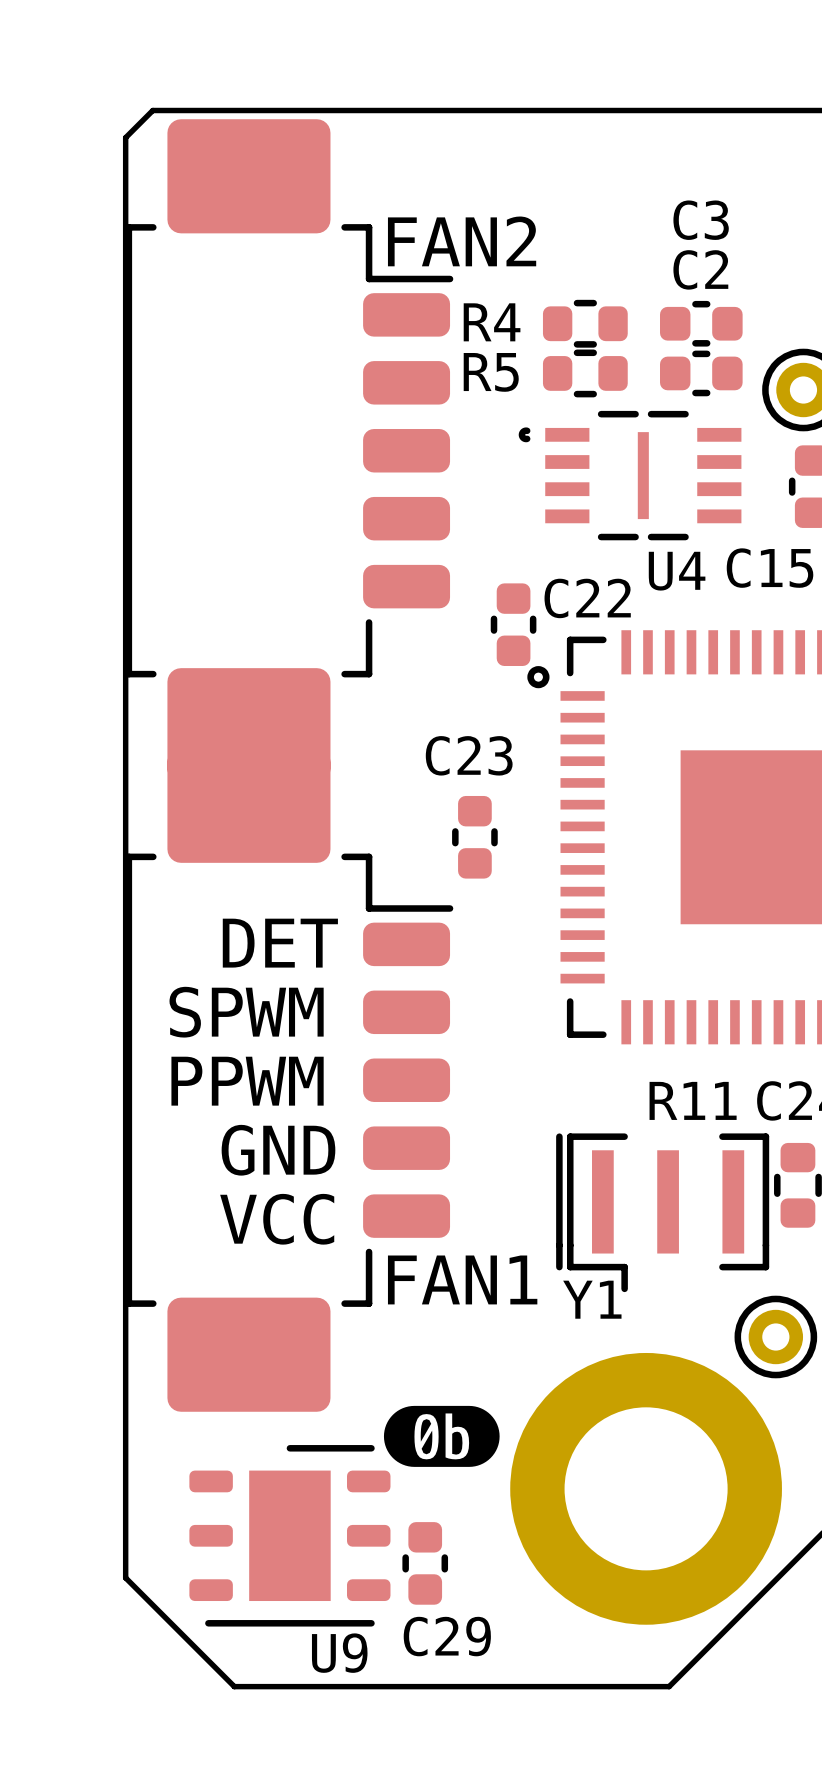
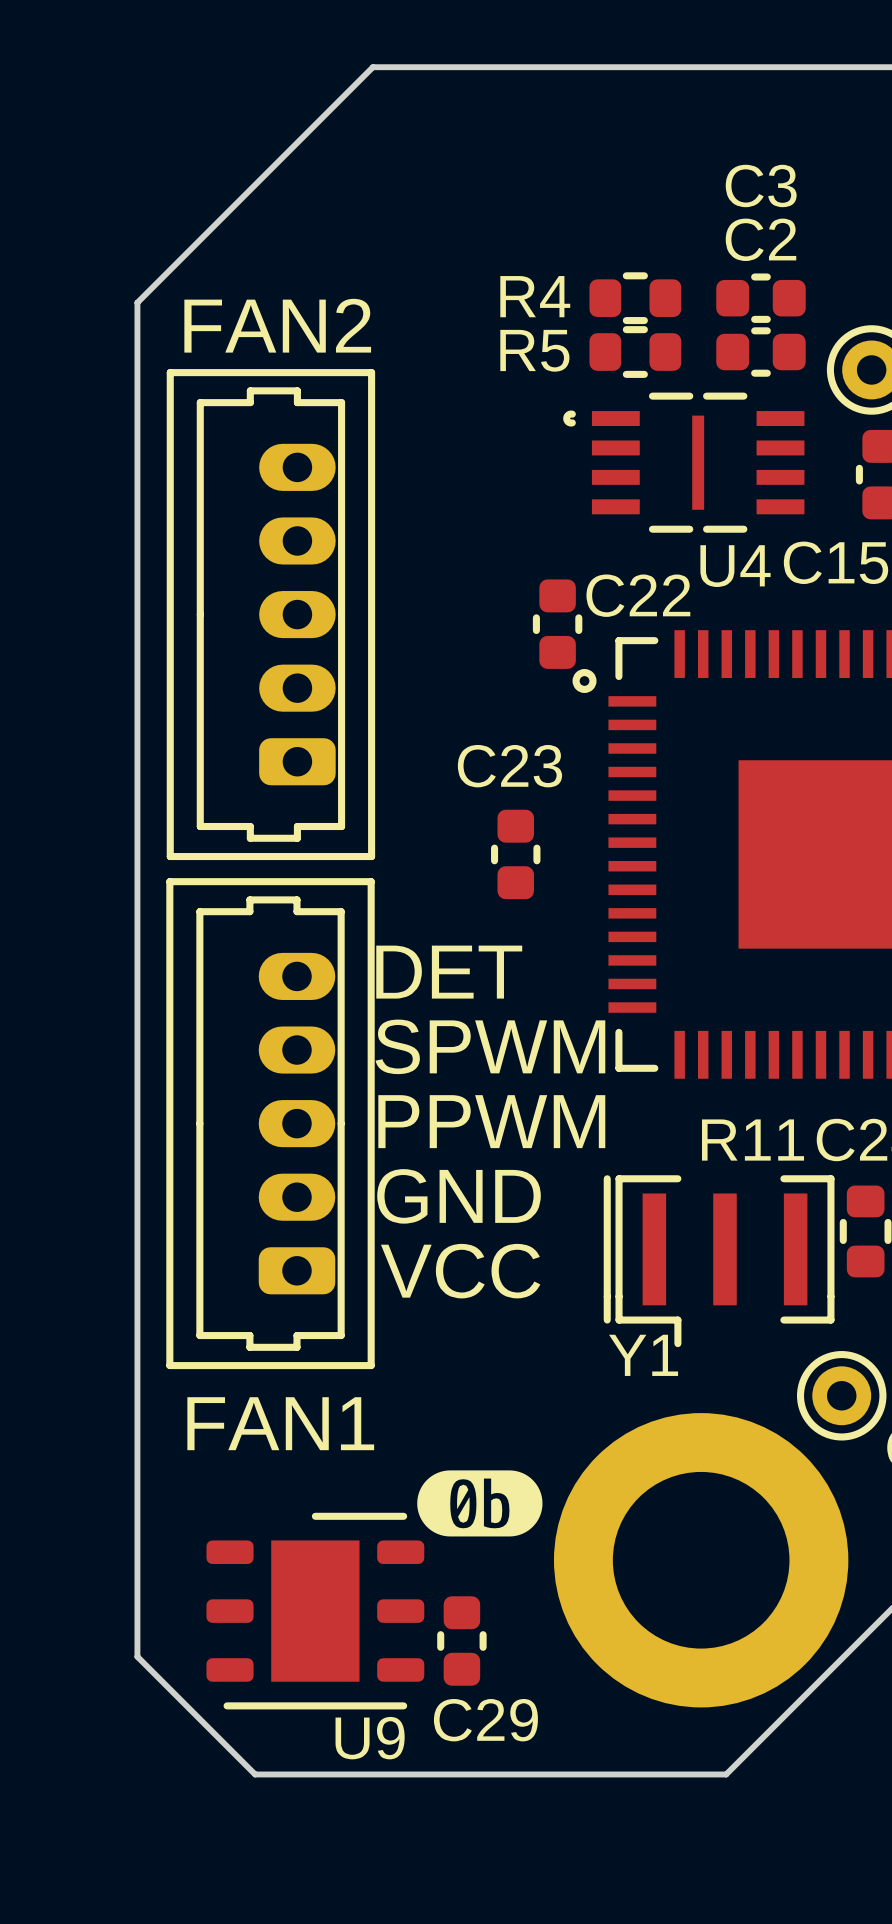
board edge: (343, 110) (152, 110) (125, 137) (125, 327) -> (372, 67) (137, 302)
text position: FAN2 (462, 241) -> FAN2 (277, 325)
part: (289, 450) -> none
part: none -> (270, 614)
part footprint: [125, 748, 454, 1412] -> [166, 878, 375, 1370]
text position: DET (280, 943) -> DET (449, 972)
text position: SPWM (246, 1012) -> SPWM (490, 1046)
text position: PPWM (247, 1081) -> PPWM (491, 1121)
text position: GND (278, 1150) -> GND (459, 1196)
text position: VCC (277, 1219) -> VCC (460, 1271)
text position: FAN1 (462, 1279) -> FAN1 (280, 1423)

